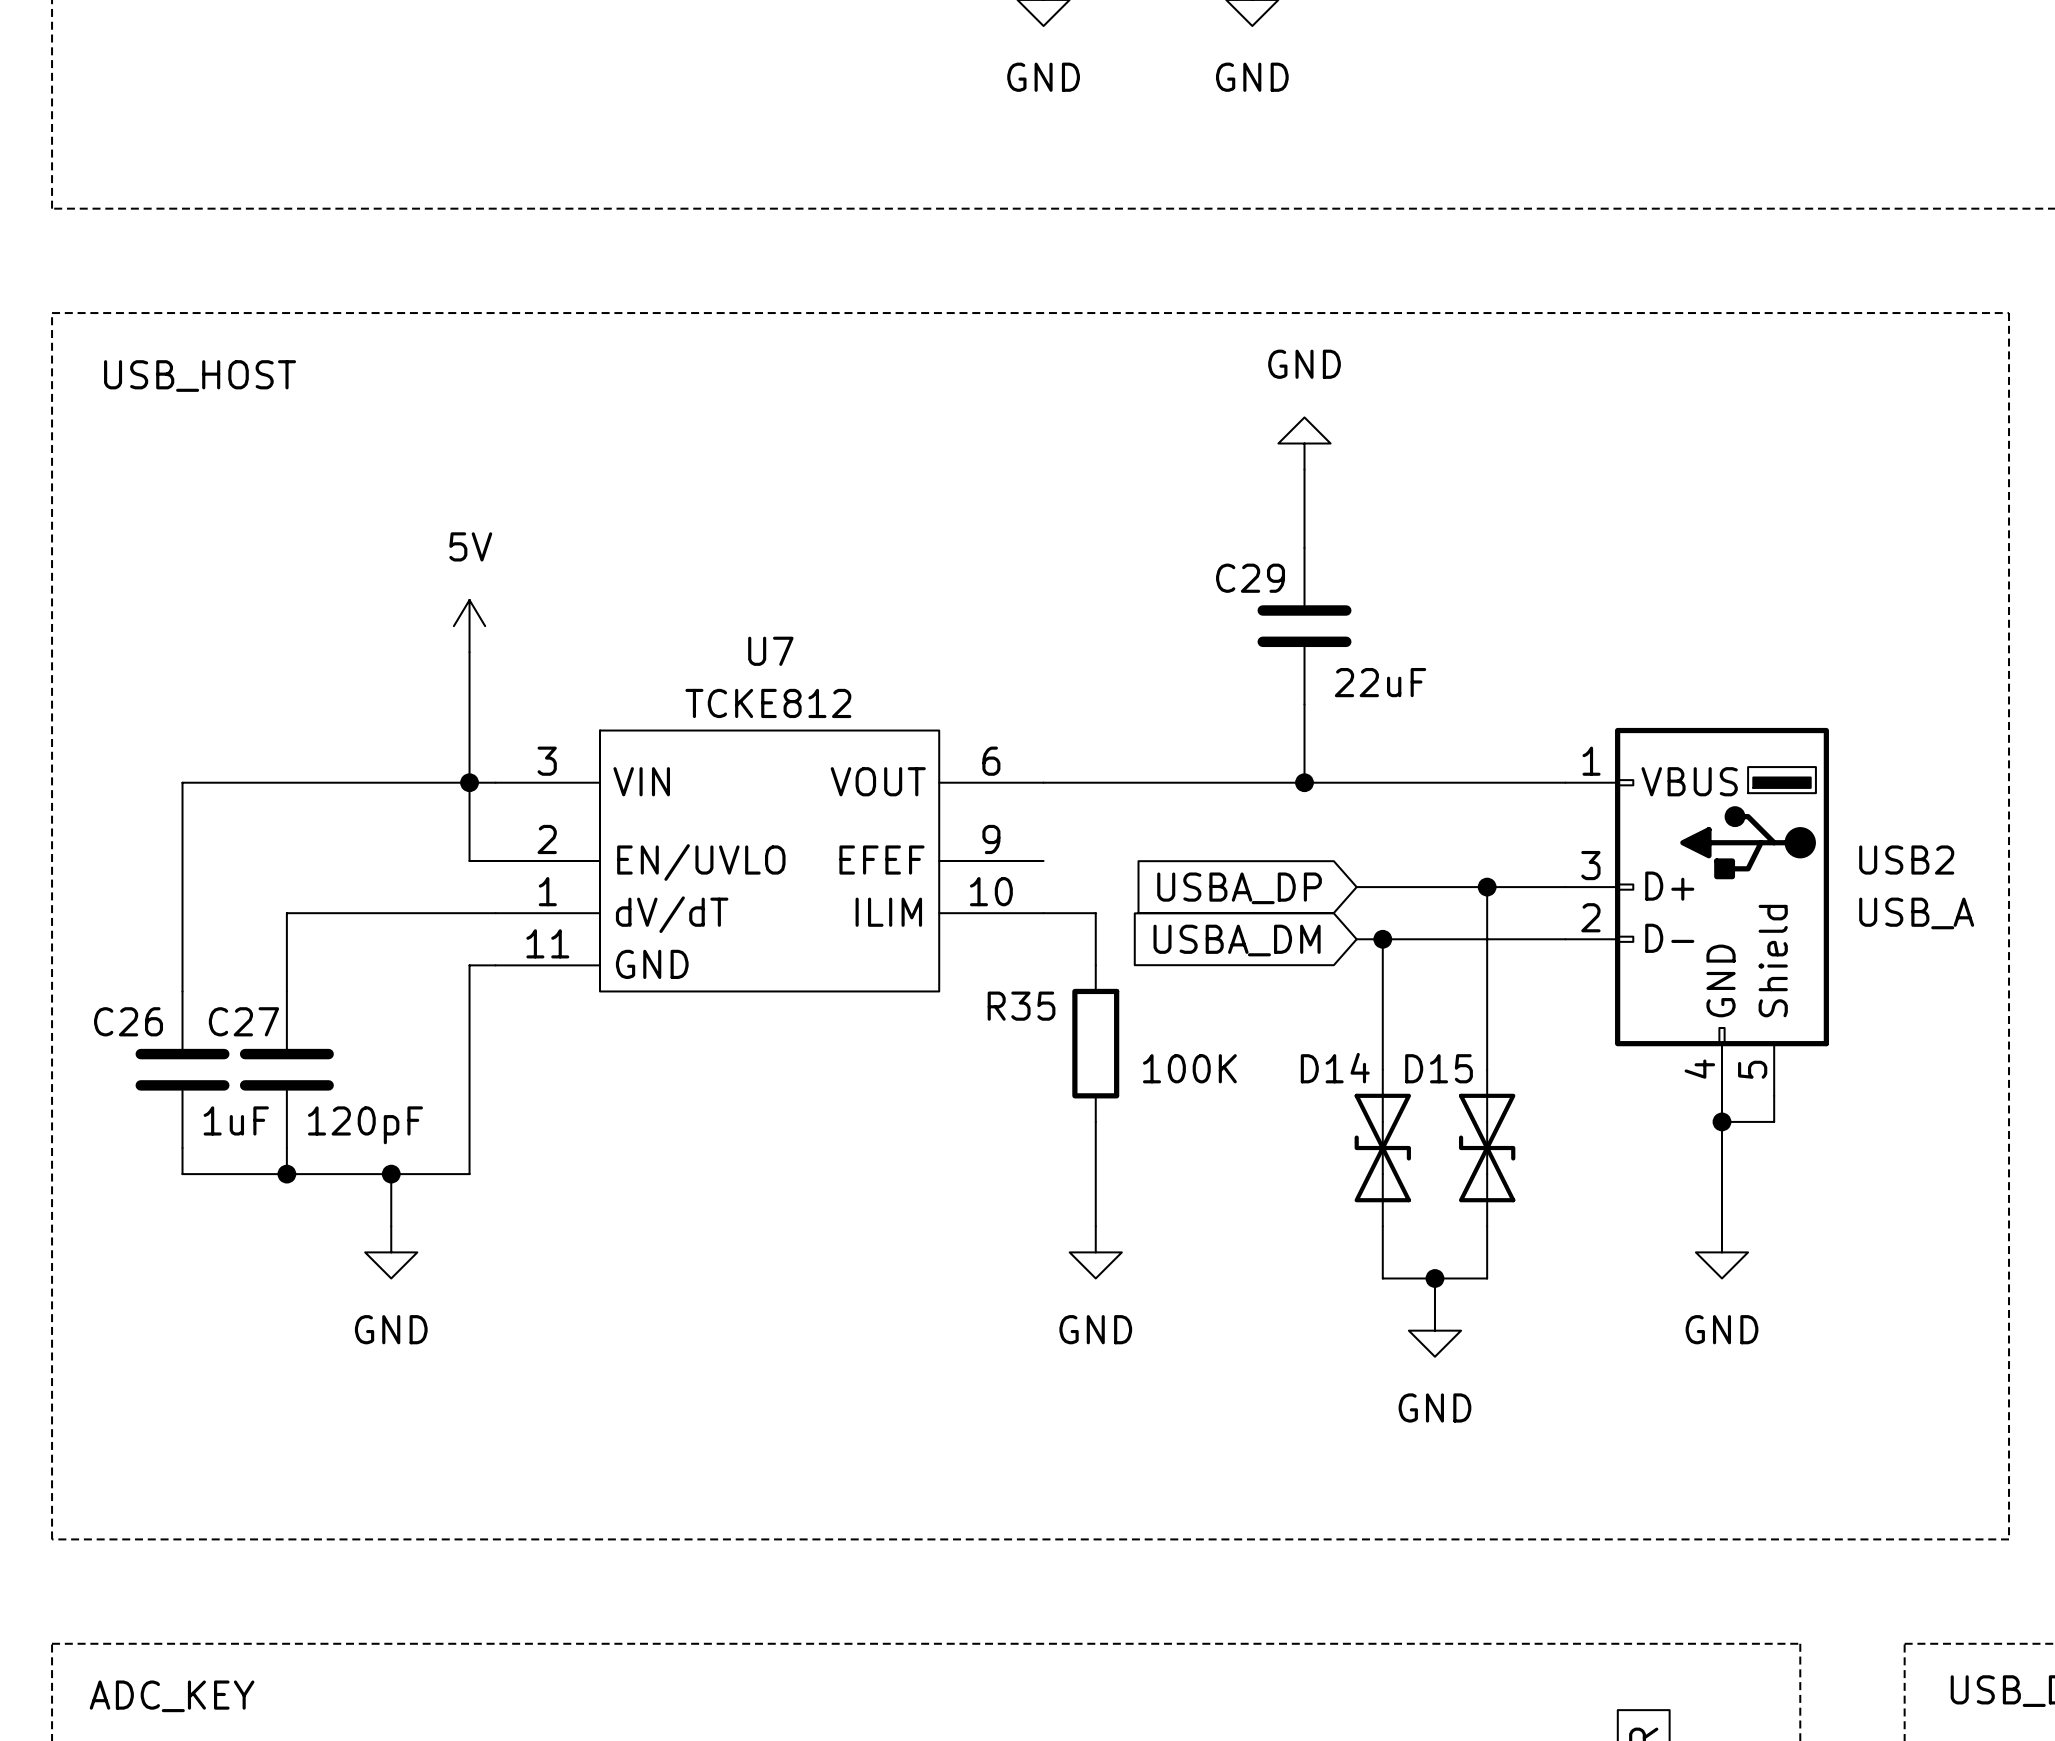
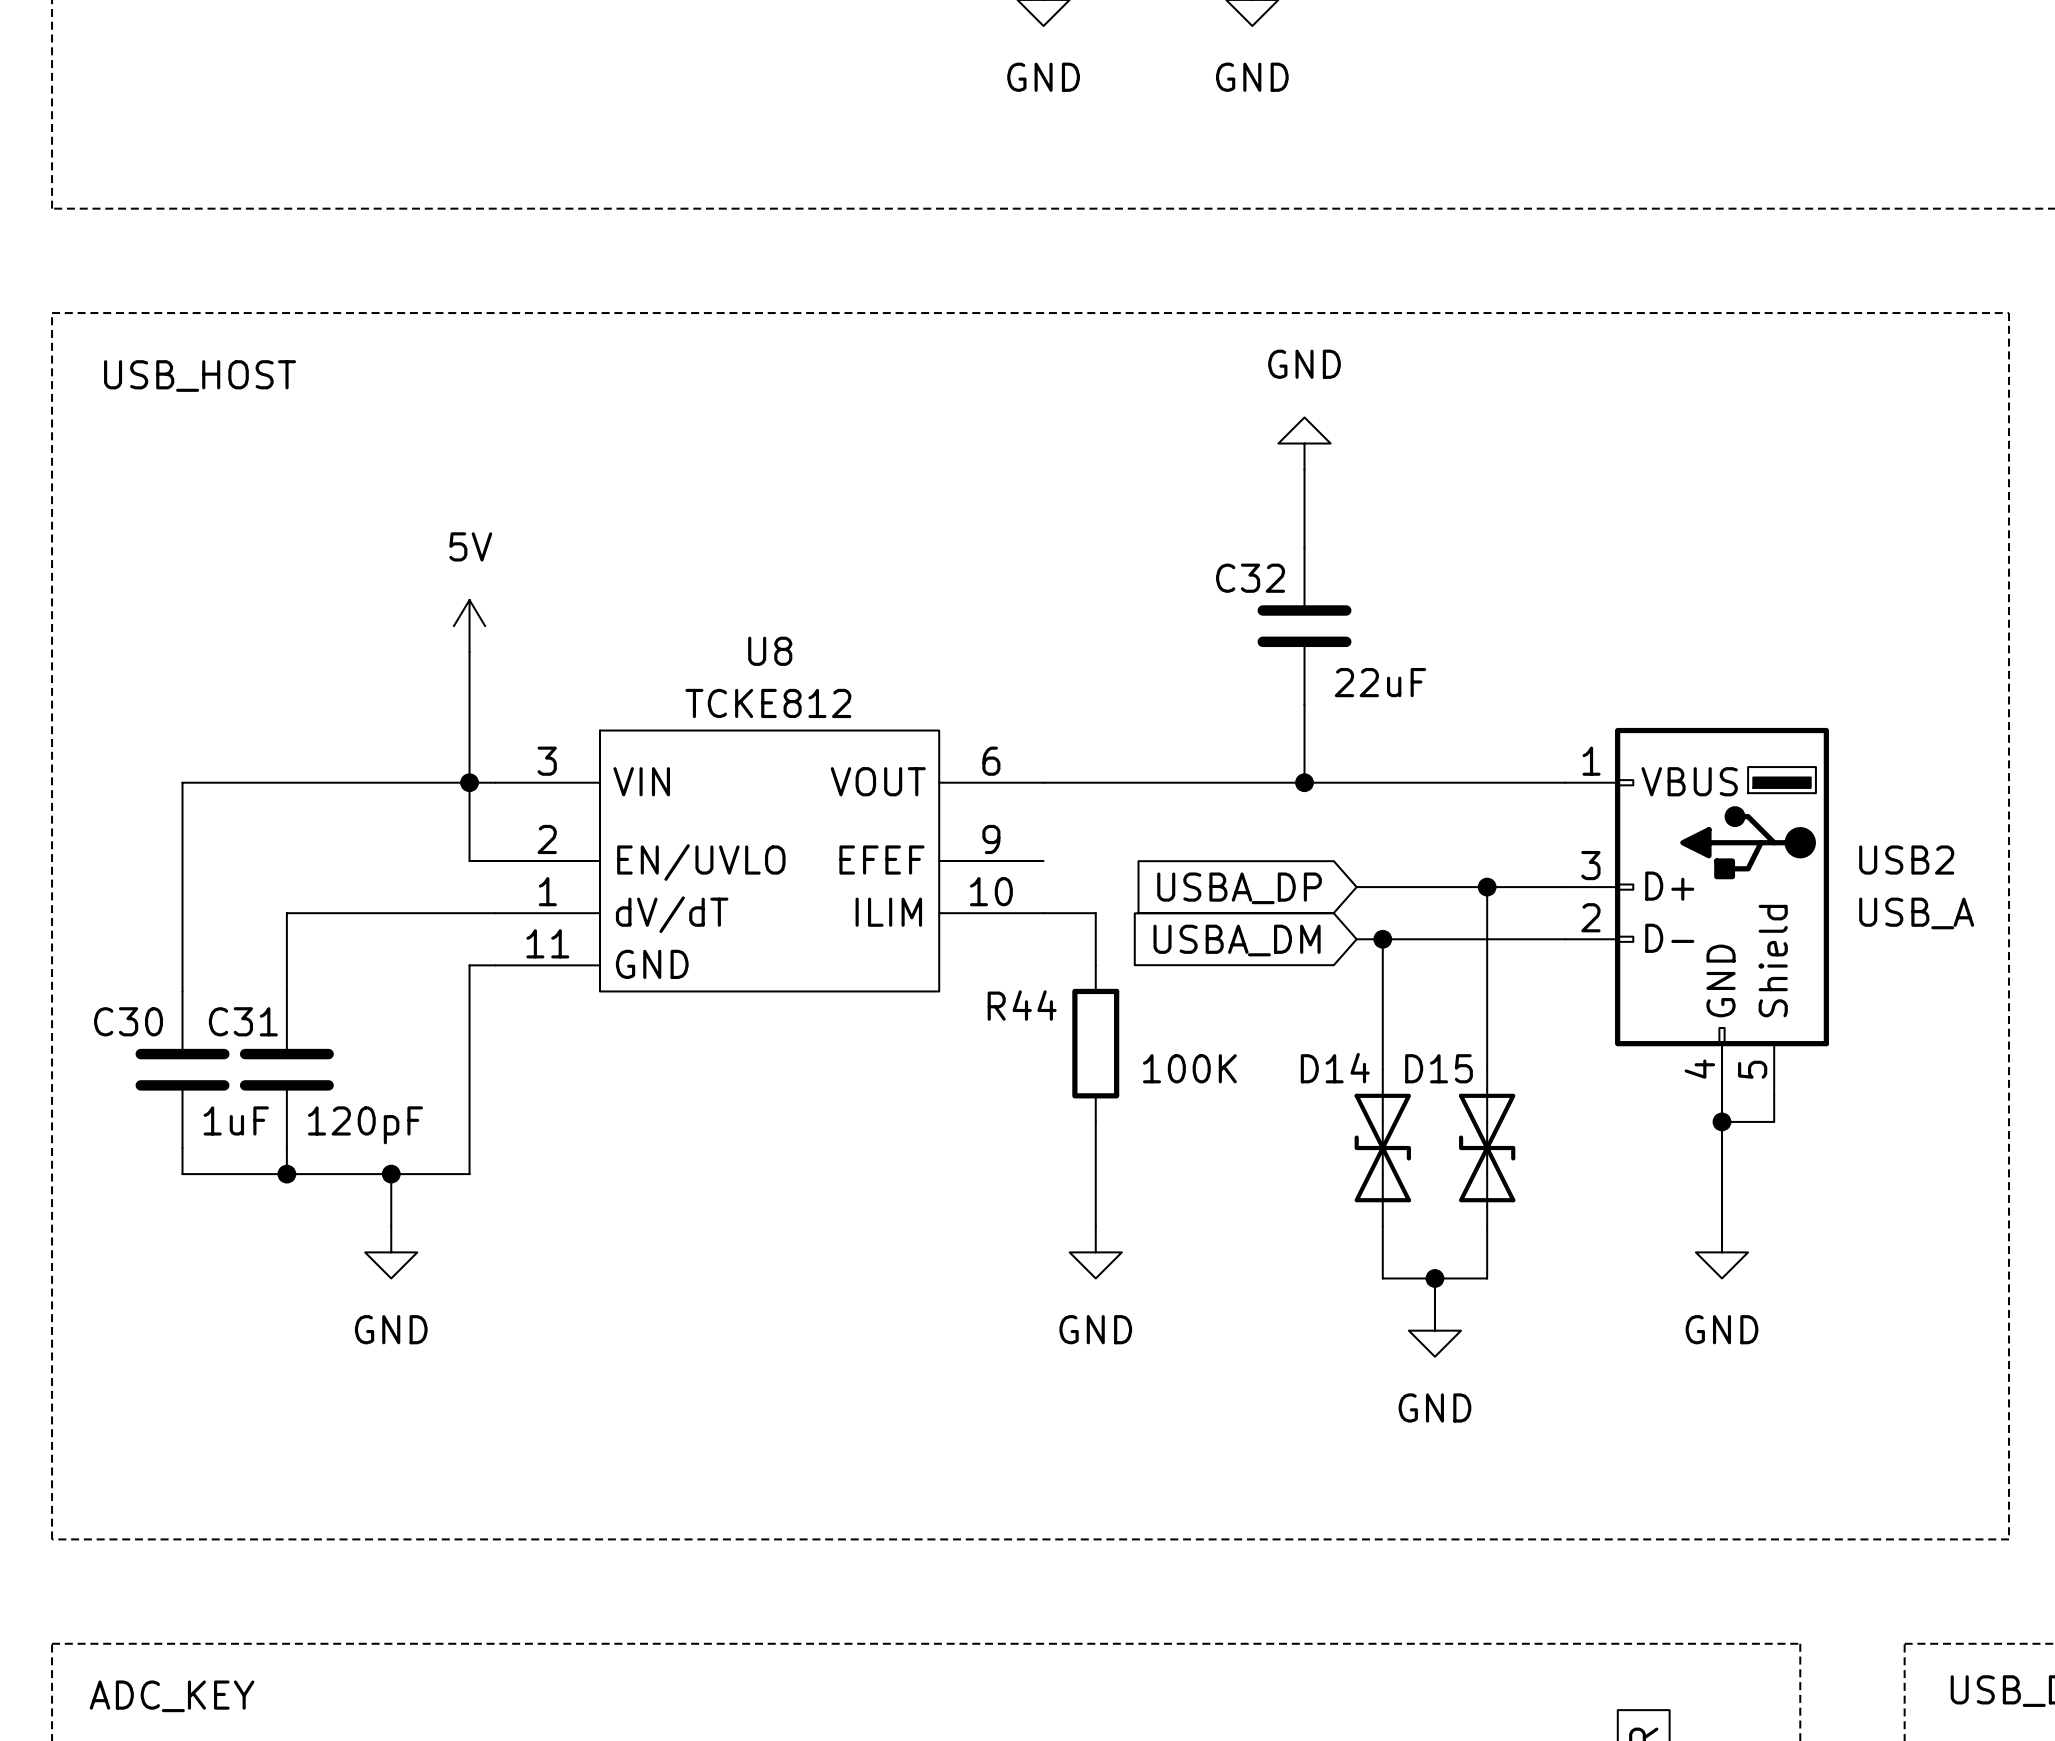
C29 name: C29 (1250, 578) -> C32 (1250, 578)
U7 name: U7 (770, 651) -> U8 (770, 651)
R35 name: R35 (1021, 1006) -> R44 (1022, 1005)
C26 name: C26 (128, 1021) -> C30 (128, 1021)
C27 name: C27 (243, 1021) -> C31 (243, 1021)

